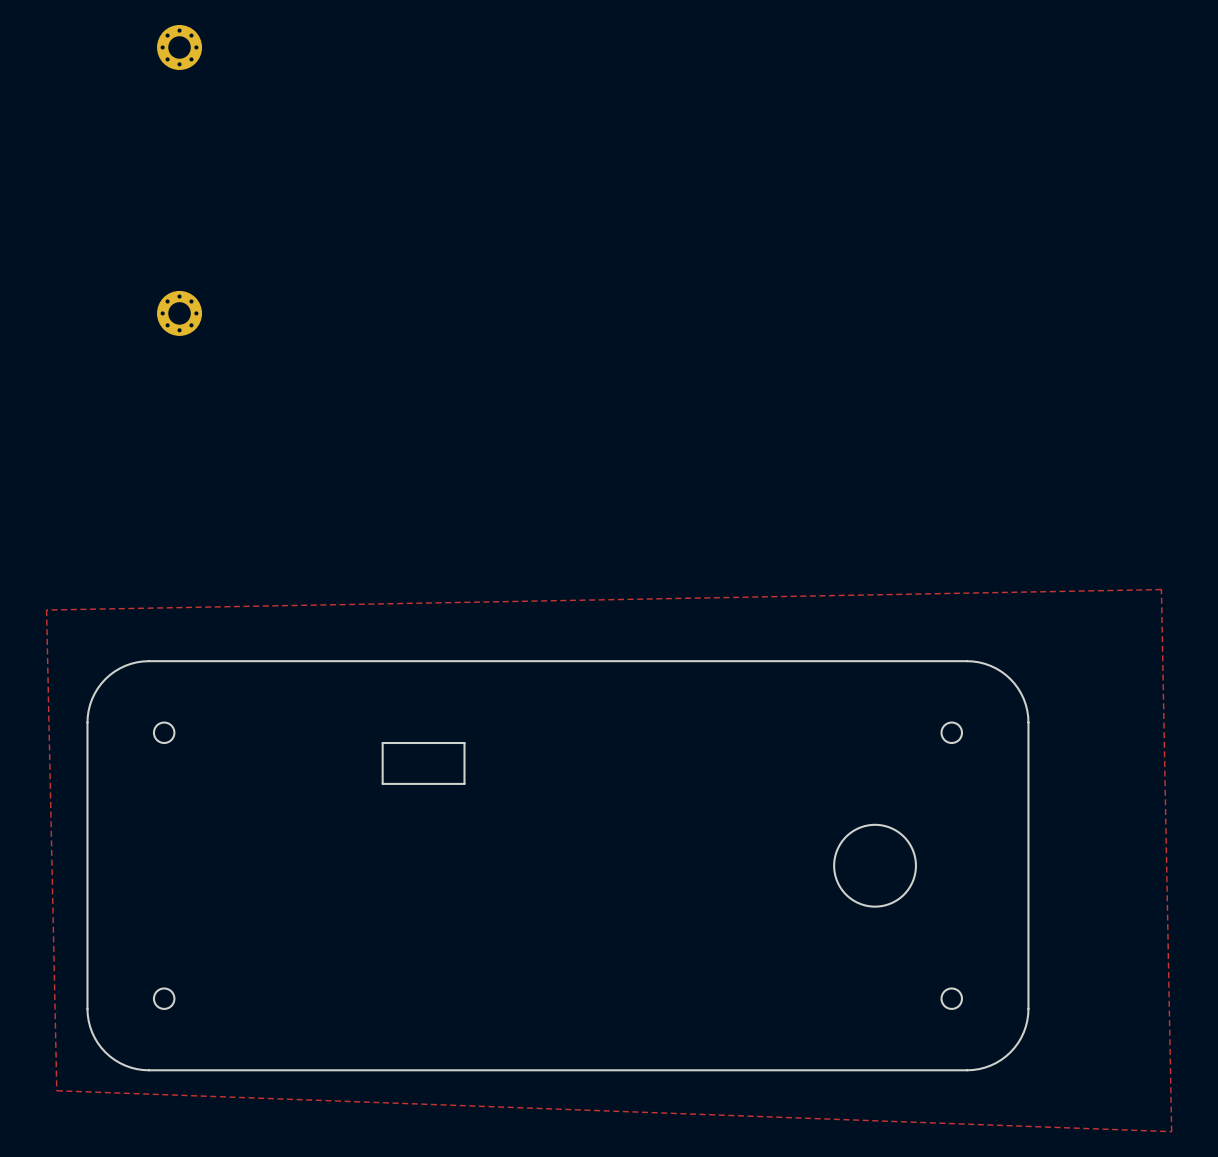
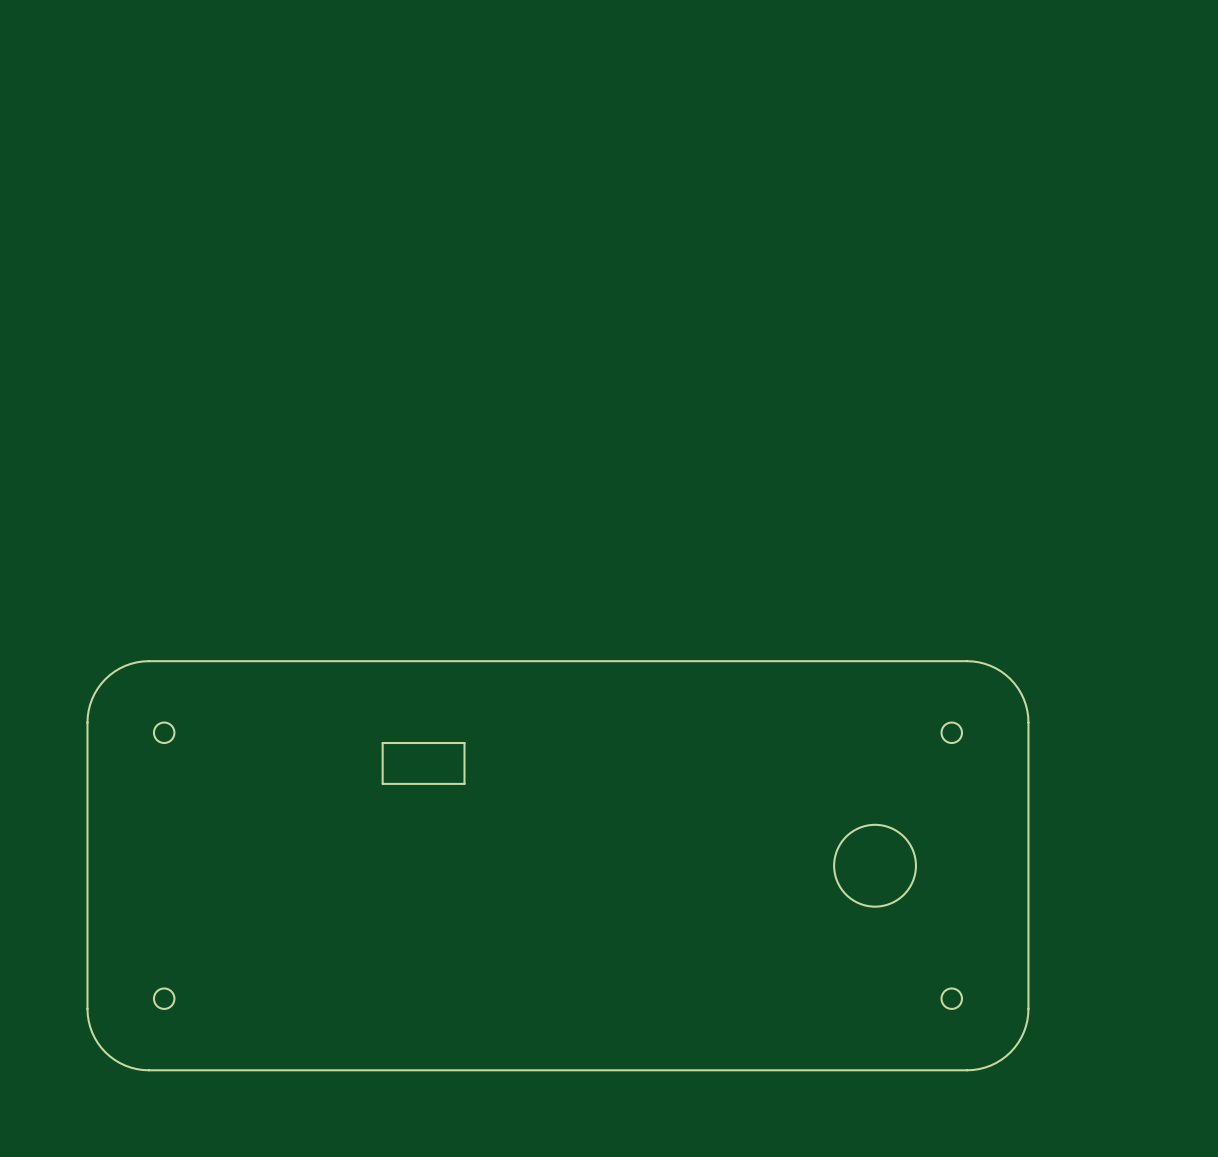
part: (179, 47) -> none
part: (179, 313) -> none
zone outline: (1161, 589) (1171, 1131) (56, 1090) (46, 610) (1161, 589) -> none

